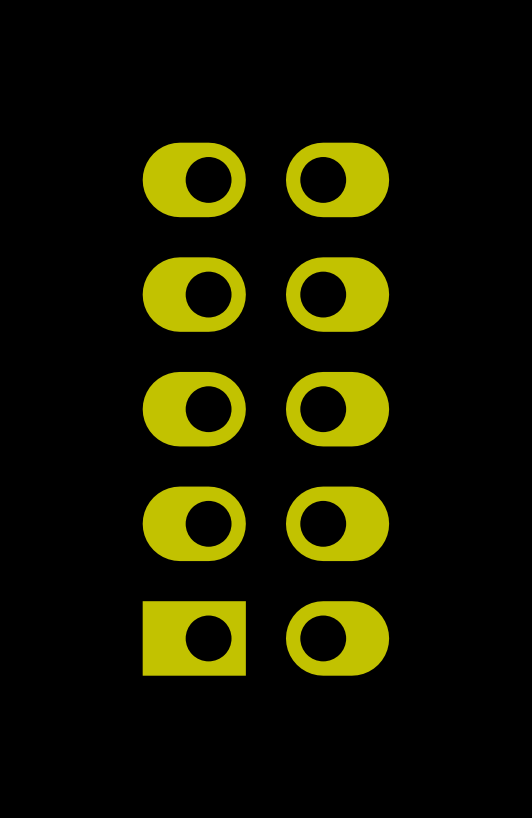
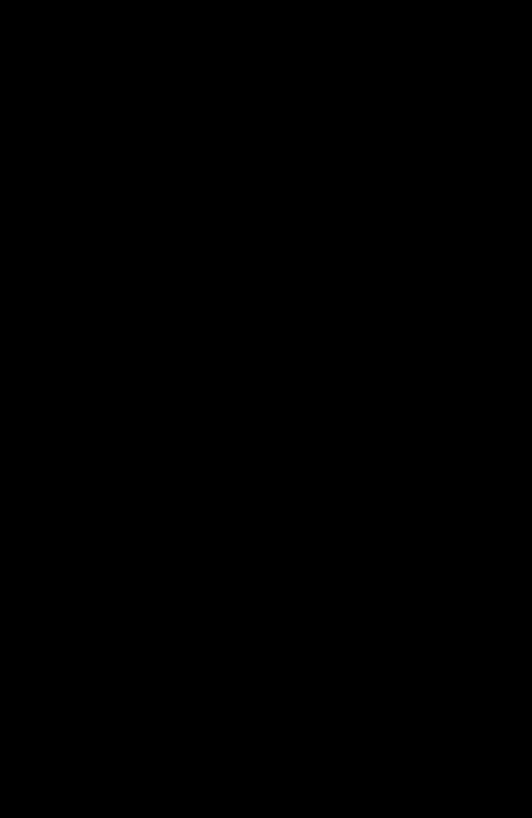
part: (265, 409) -> none

